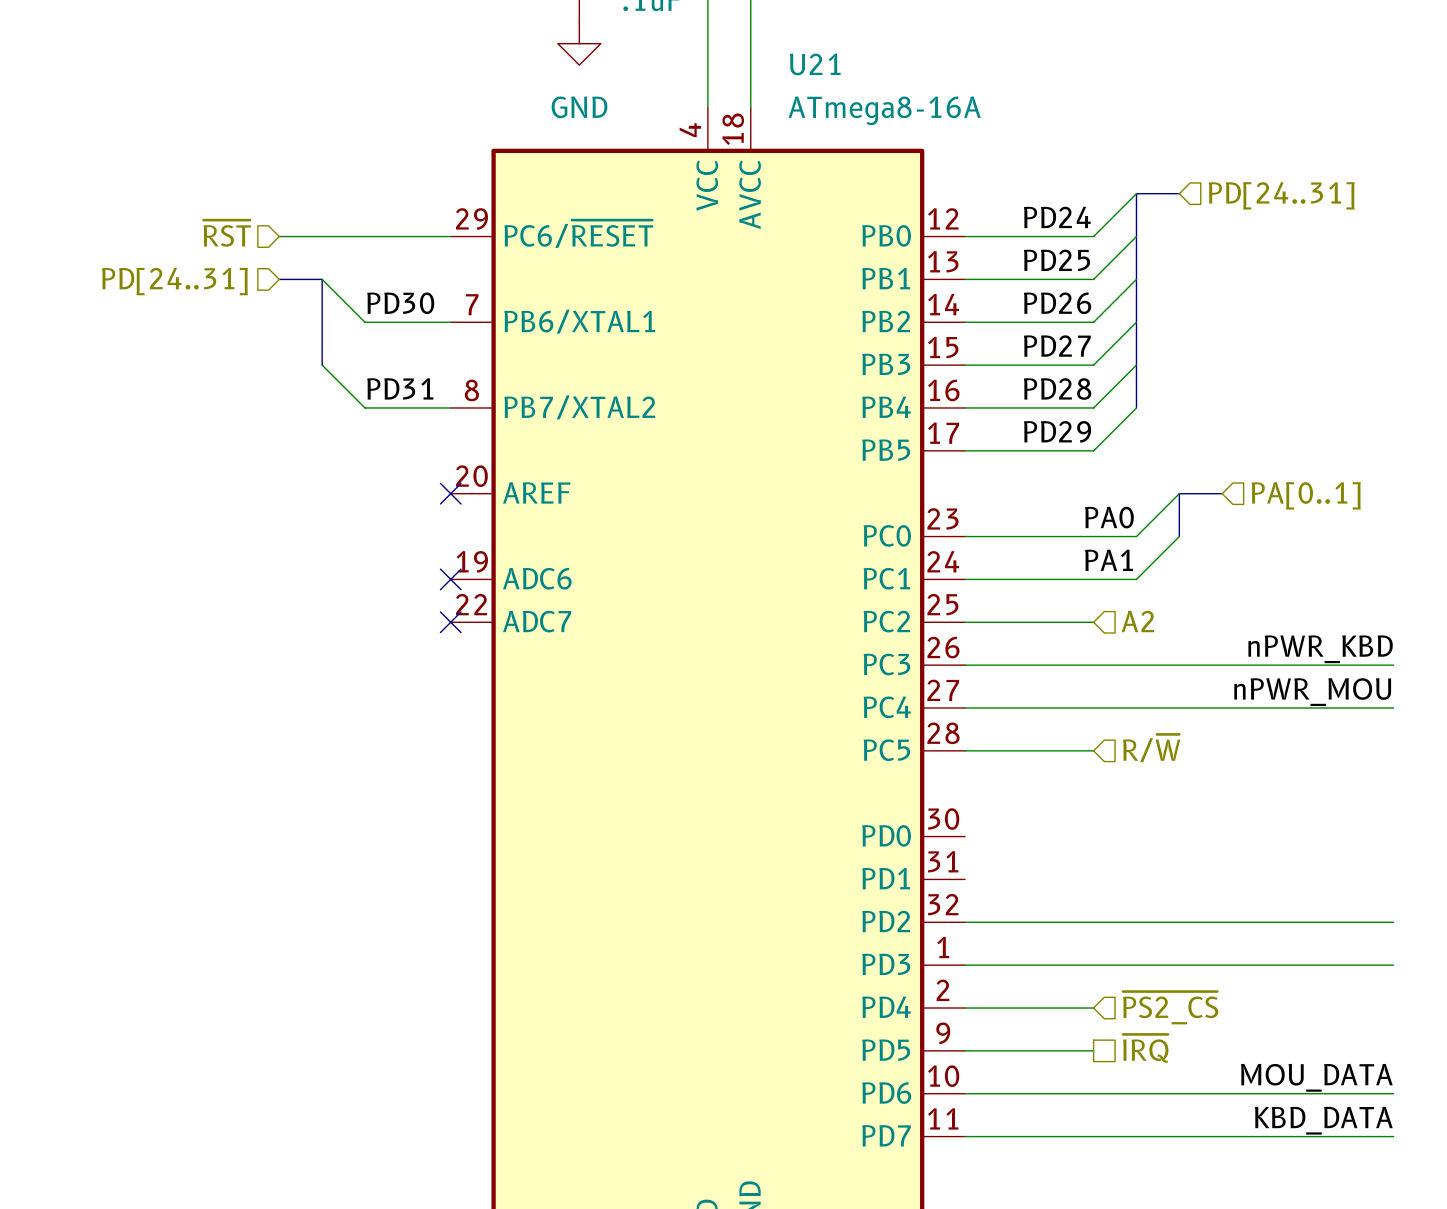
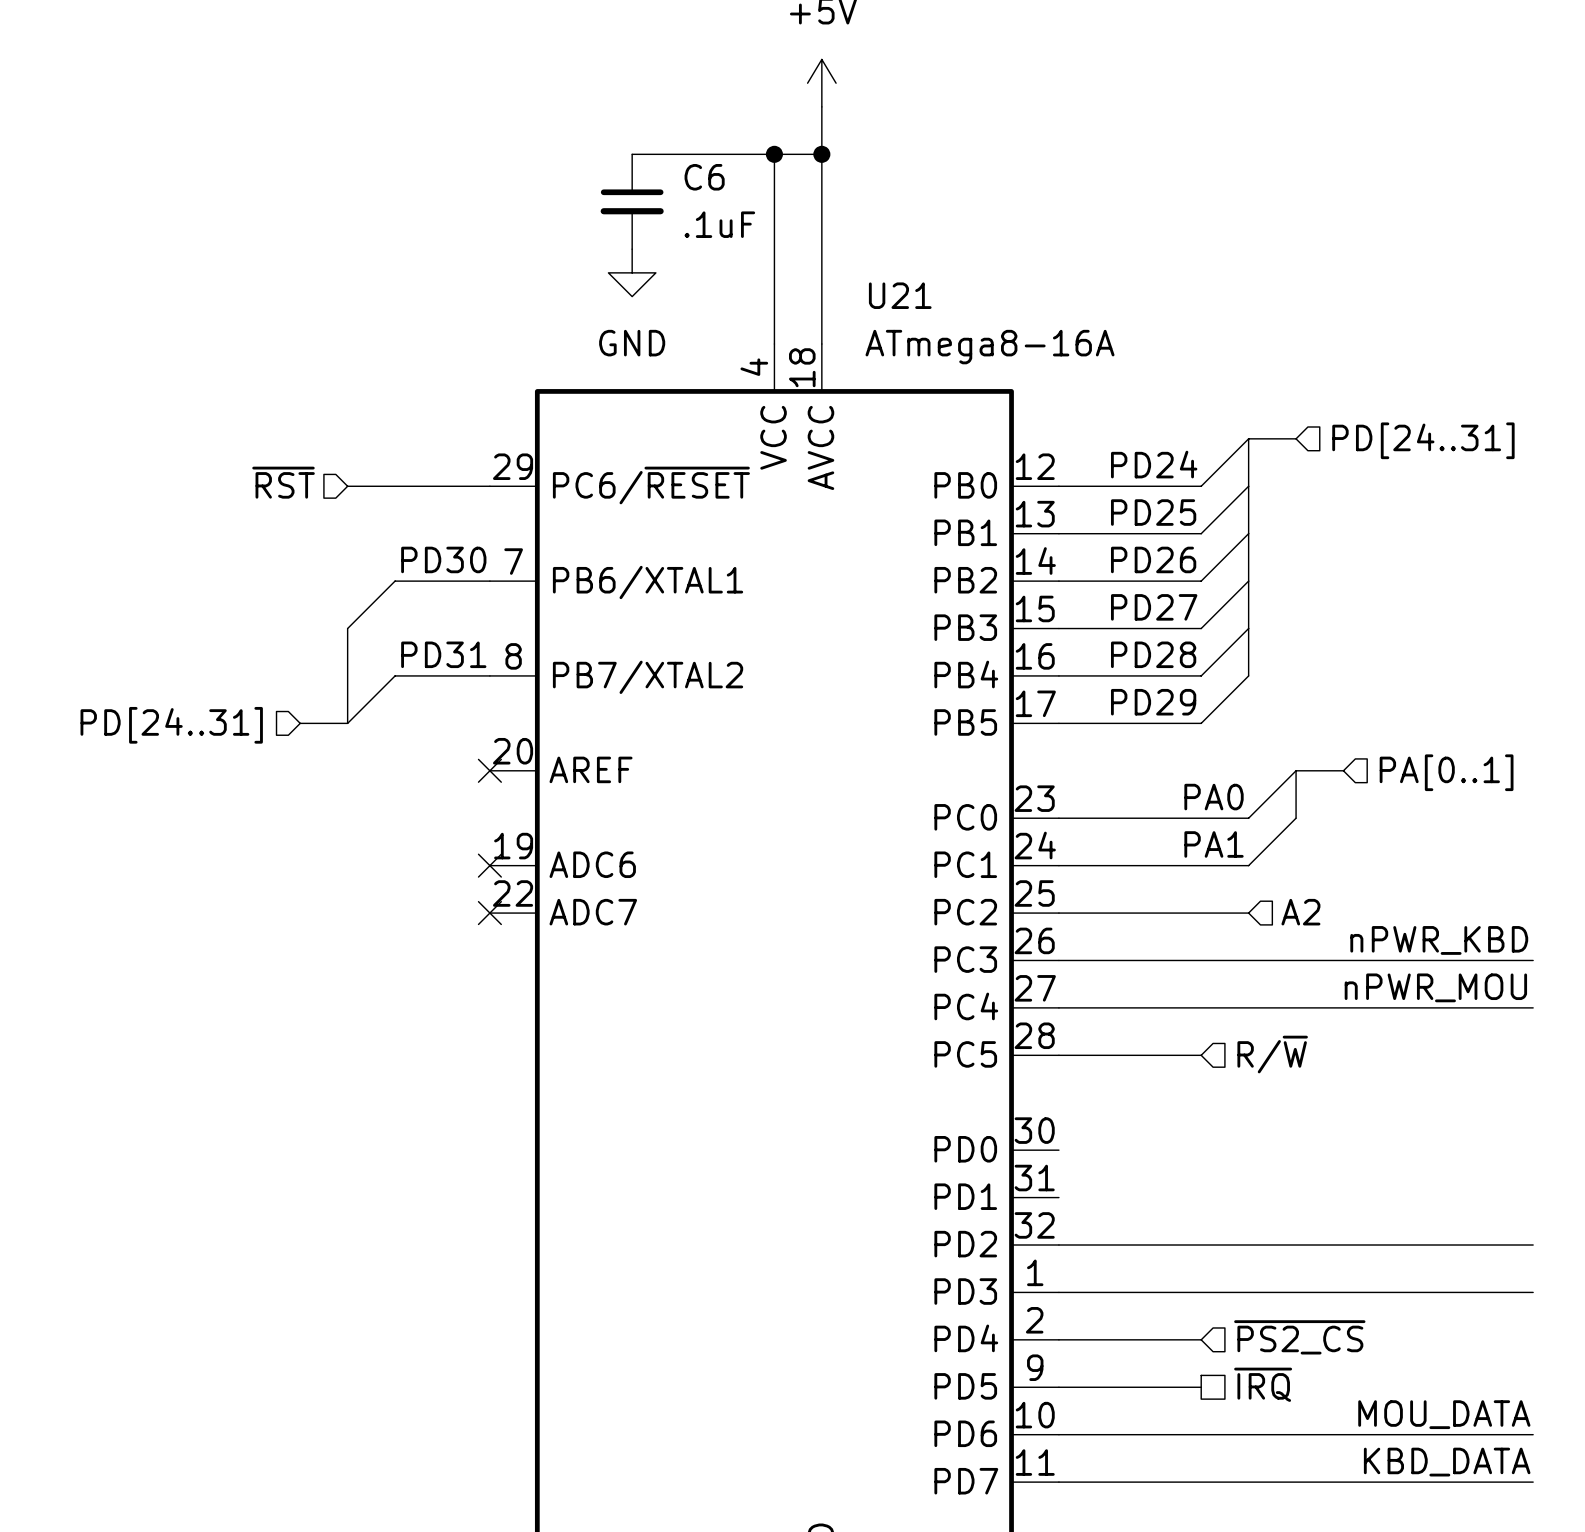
hierarchical label position: ~{RST} (227, 233) -> ~{RST} (283, 482)
wire: (279, 236) (322, 236) -> none
bus: (279, 279) (322, 279) (322, 365) -> (300, 723) (347, 723) (347, 628)
wire: (322, 279) (365, 322) -> (347, 628) (395, 581)
hierarchical label position: PD[24..31] (174, 281) -> PD[24..31] (171, 725)
wire: (322, 365) (365, 407) -> (347, 723) (395, 675)
hierarchical label position: A2 (1137, 621) -> A2 (1300, 912)
wire: none -> (1201, 913) (1248, 913)

